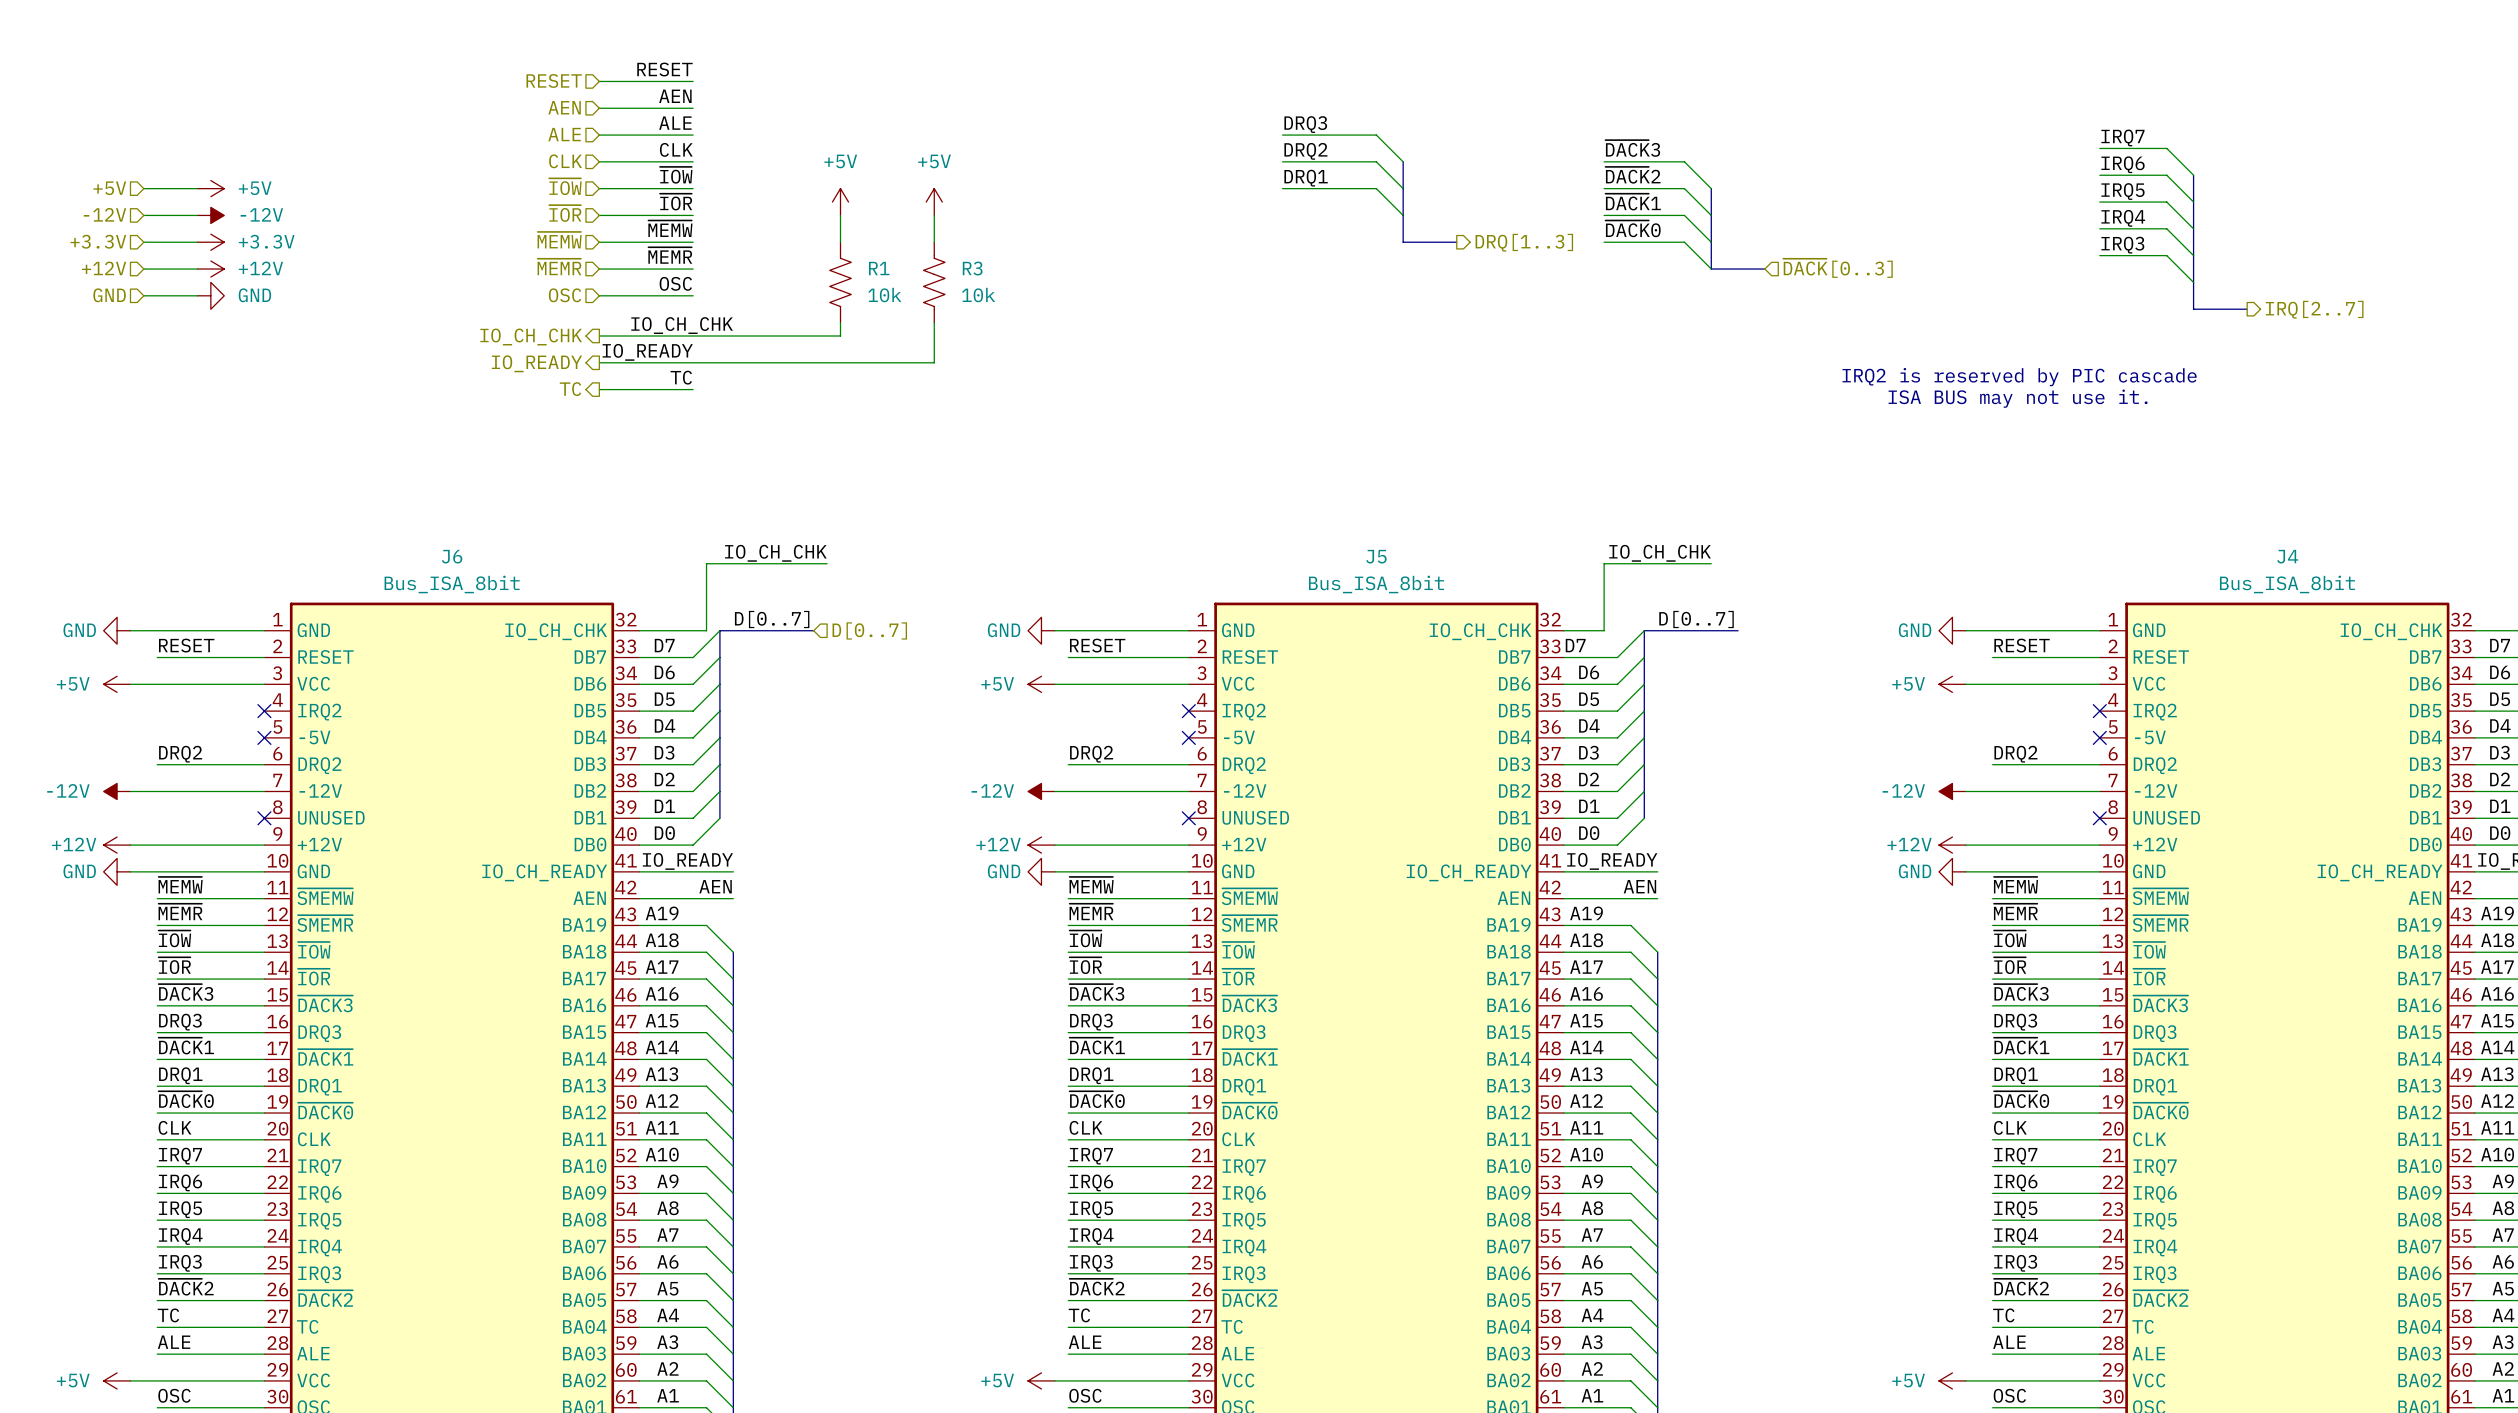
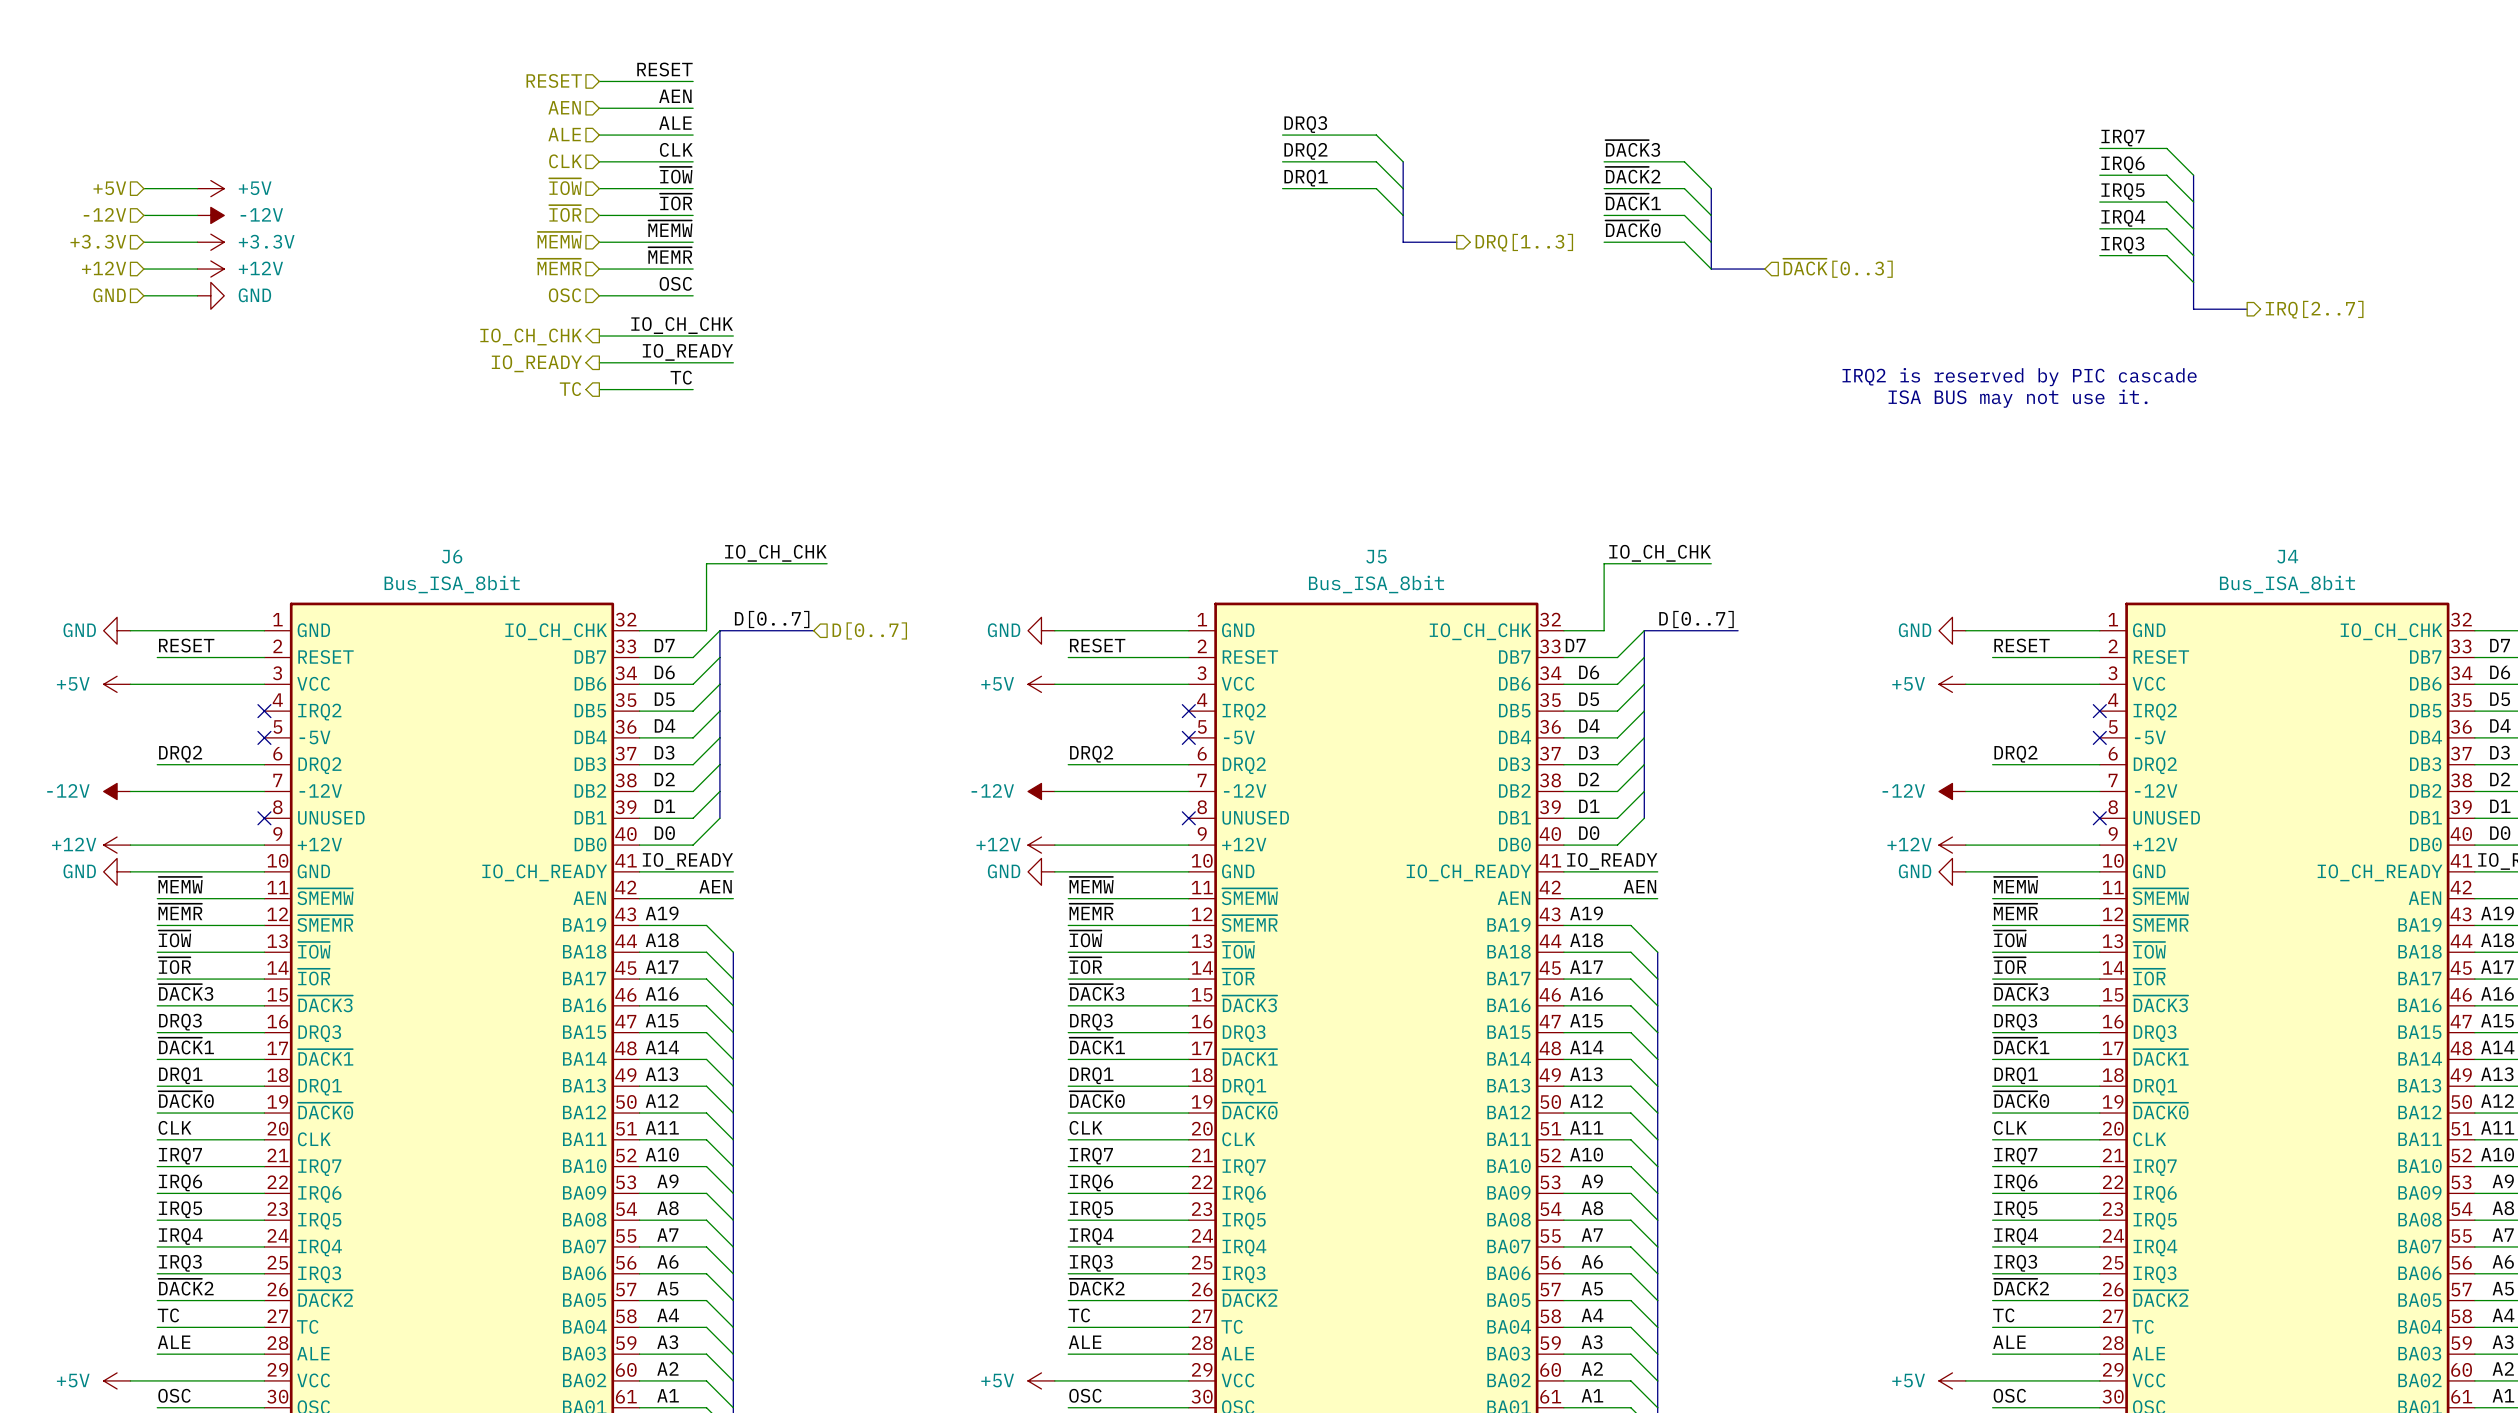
power symbol: +5V (840, 202) -> none
power symbol: +5V (934, 202) -> none
wire: (840, 215) (840, 242) -> none
wire: (934, 215) (934, 242) -> none
R1: 10k (840, 282) -> none
R3: 10k (934, 282) -> none
wire: (840, 322) (840, 336) (733, 336) -> none
wire: (934, 322) (934, 362) (733, 362) -> none
label position: IO_READY (647, 352) -> IO_READY (687, 352)

